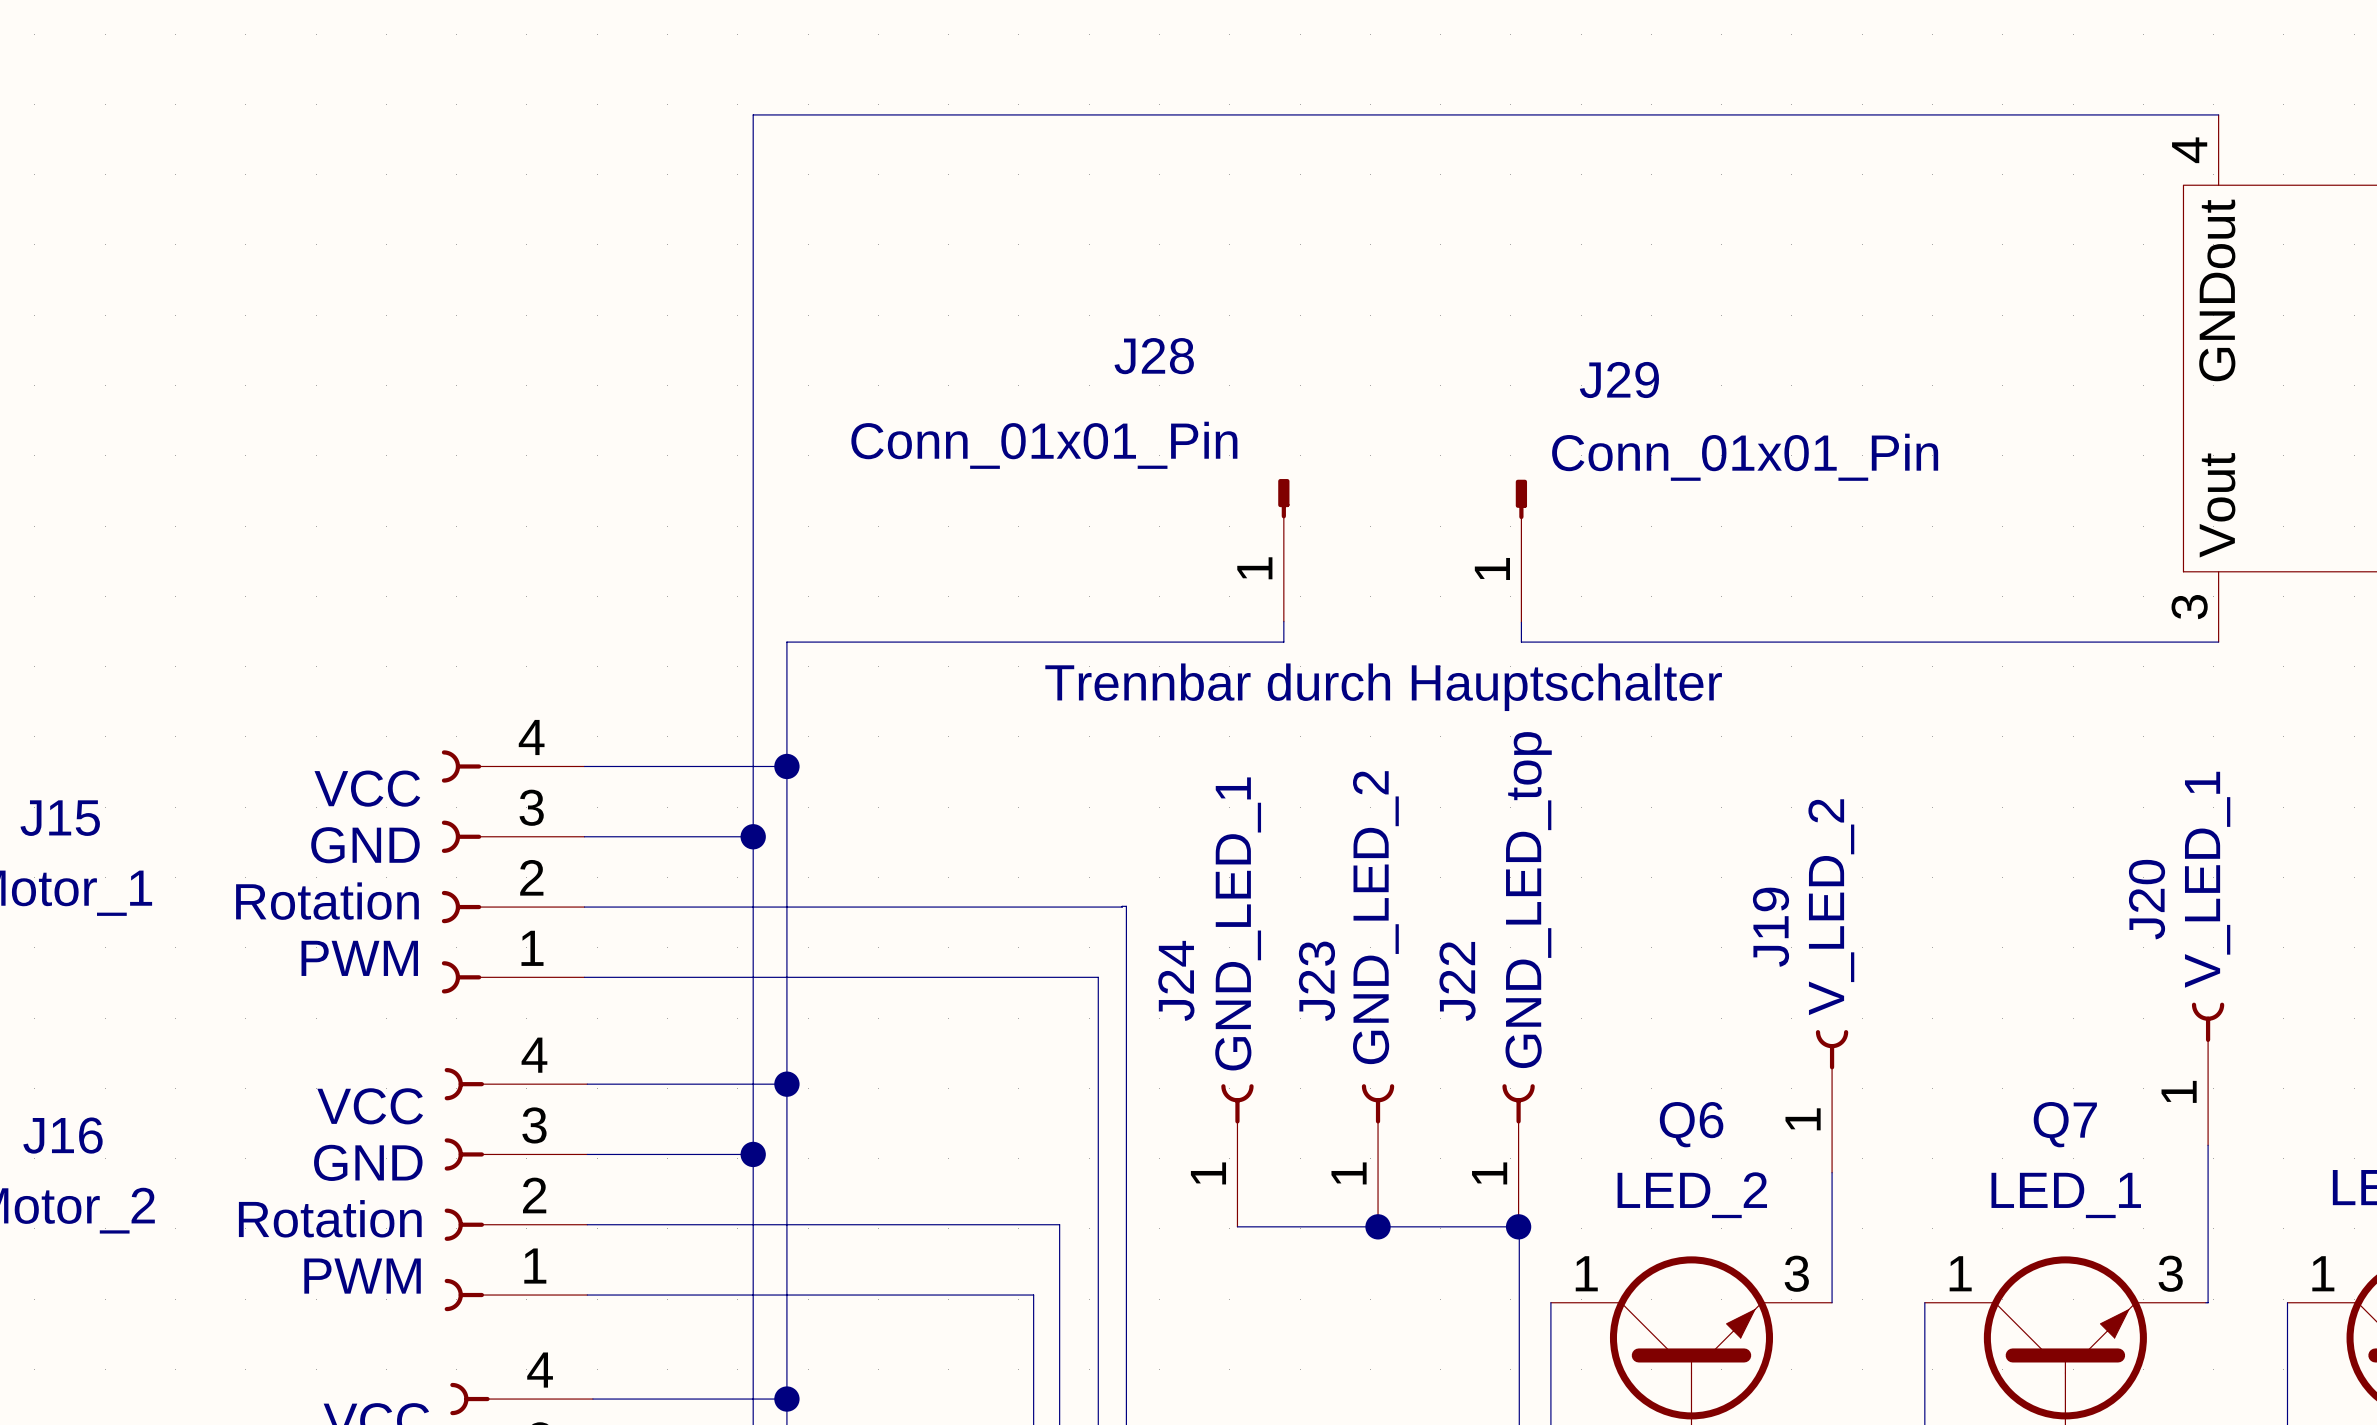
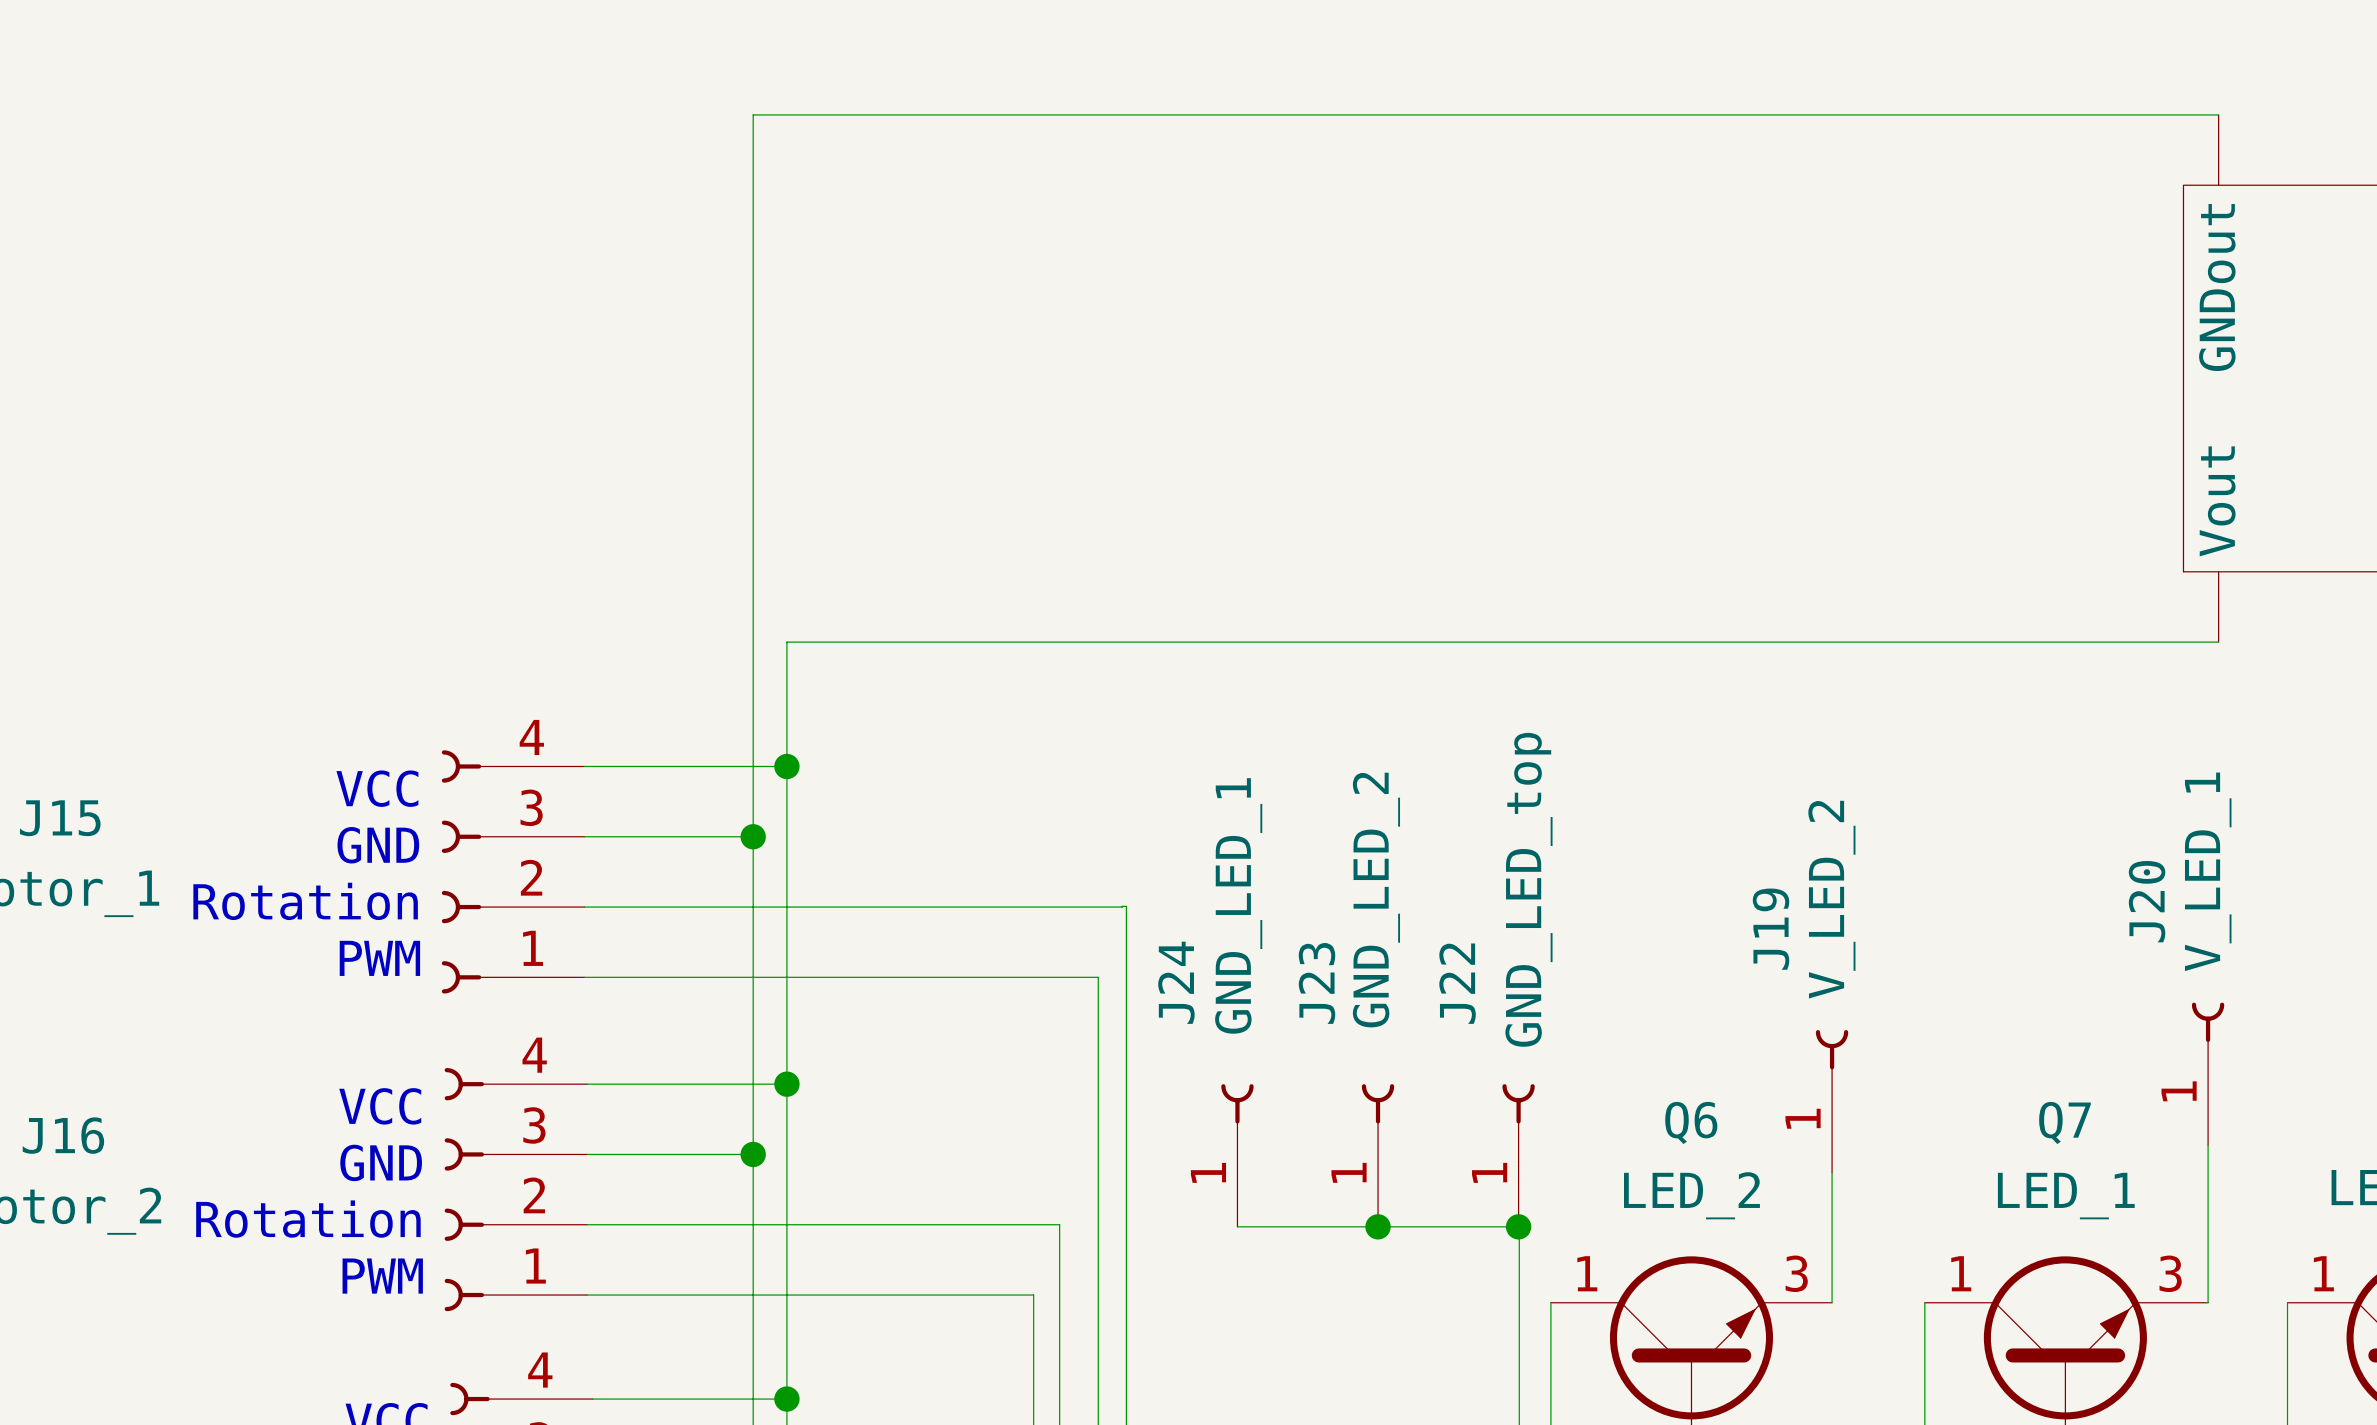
part pin number: 4 (2189, 150) -> none
J28: Conn_01x01_Pin (1283, 550) -> none
J29: Conn_01x01_Pin (1521, 551) -> none
part pin number: 3 (2189, 607) -> none
wire: (1283, 621) (1283, 642) -> none
wire: (1521, 622) (1521, 642) -> (1283, 642) (1521, 642)
text: Trennbar durch Hauptschalter (1383, 687) -> none

